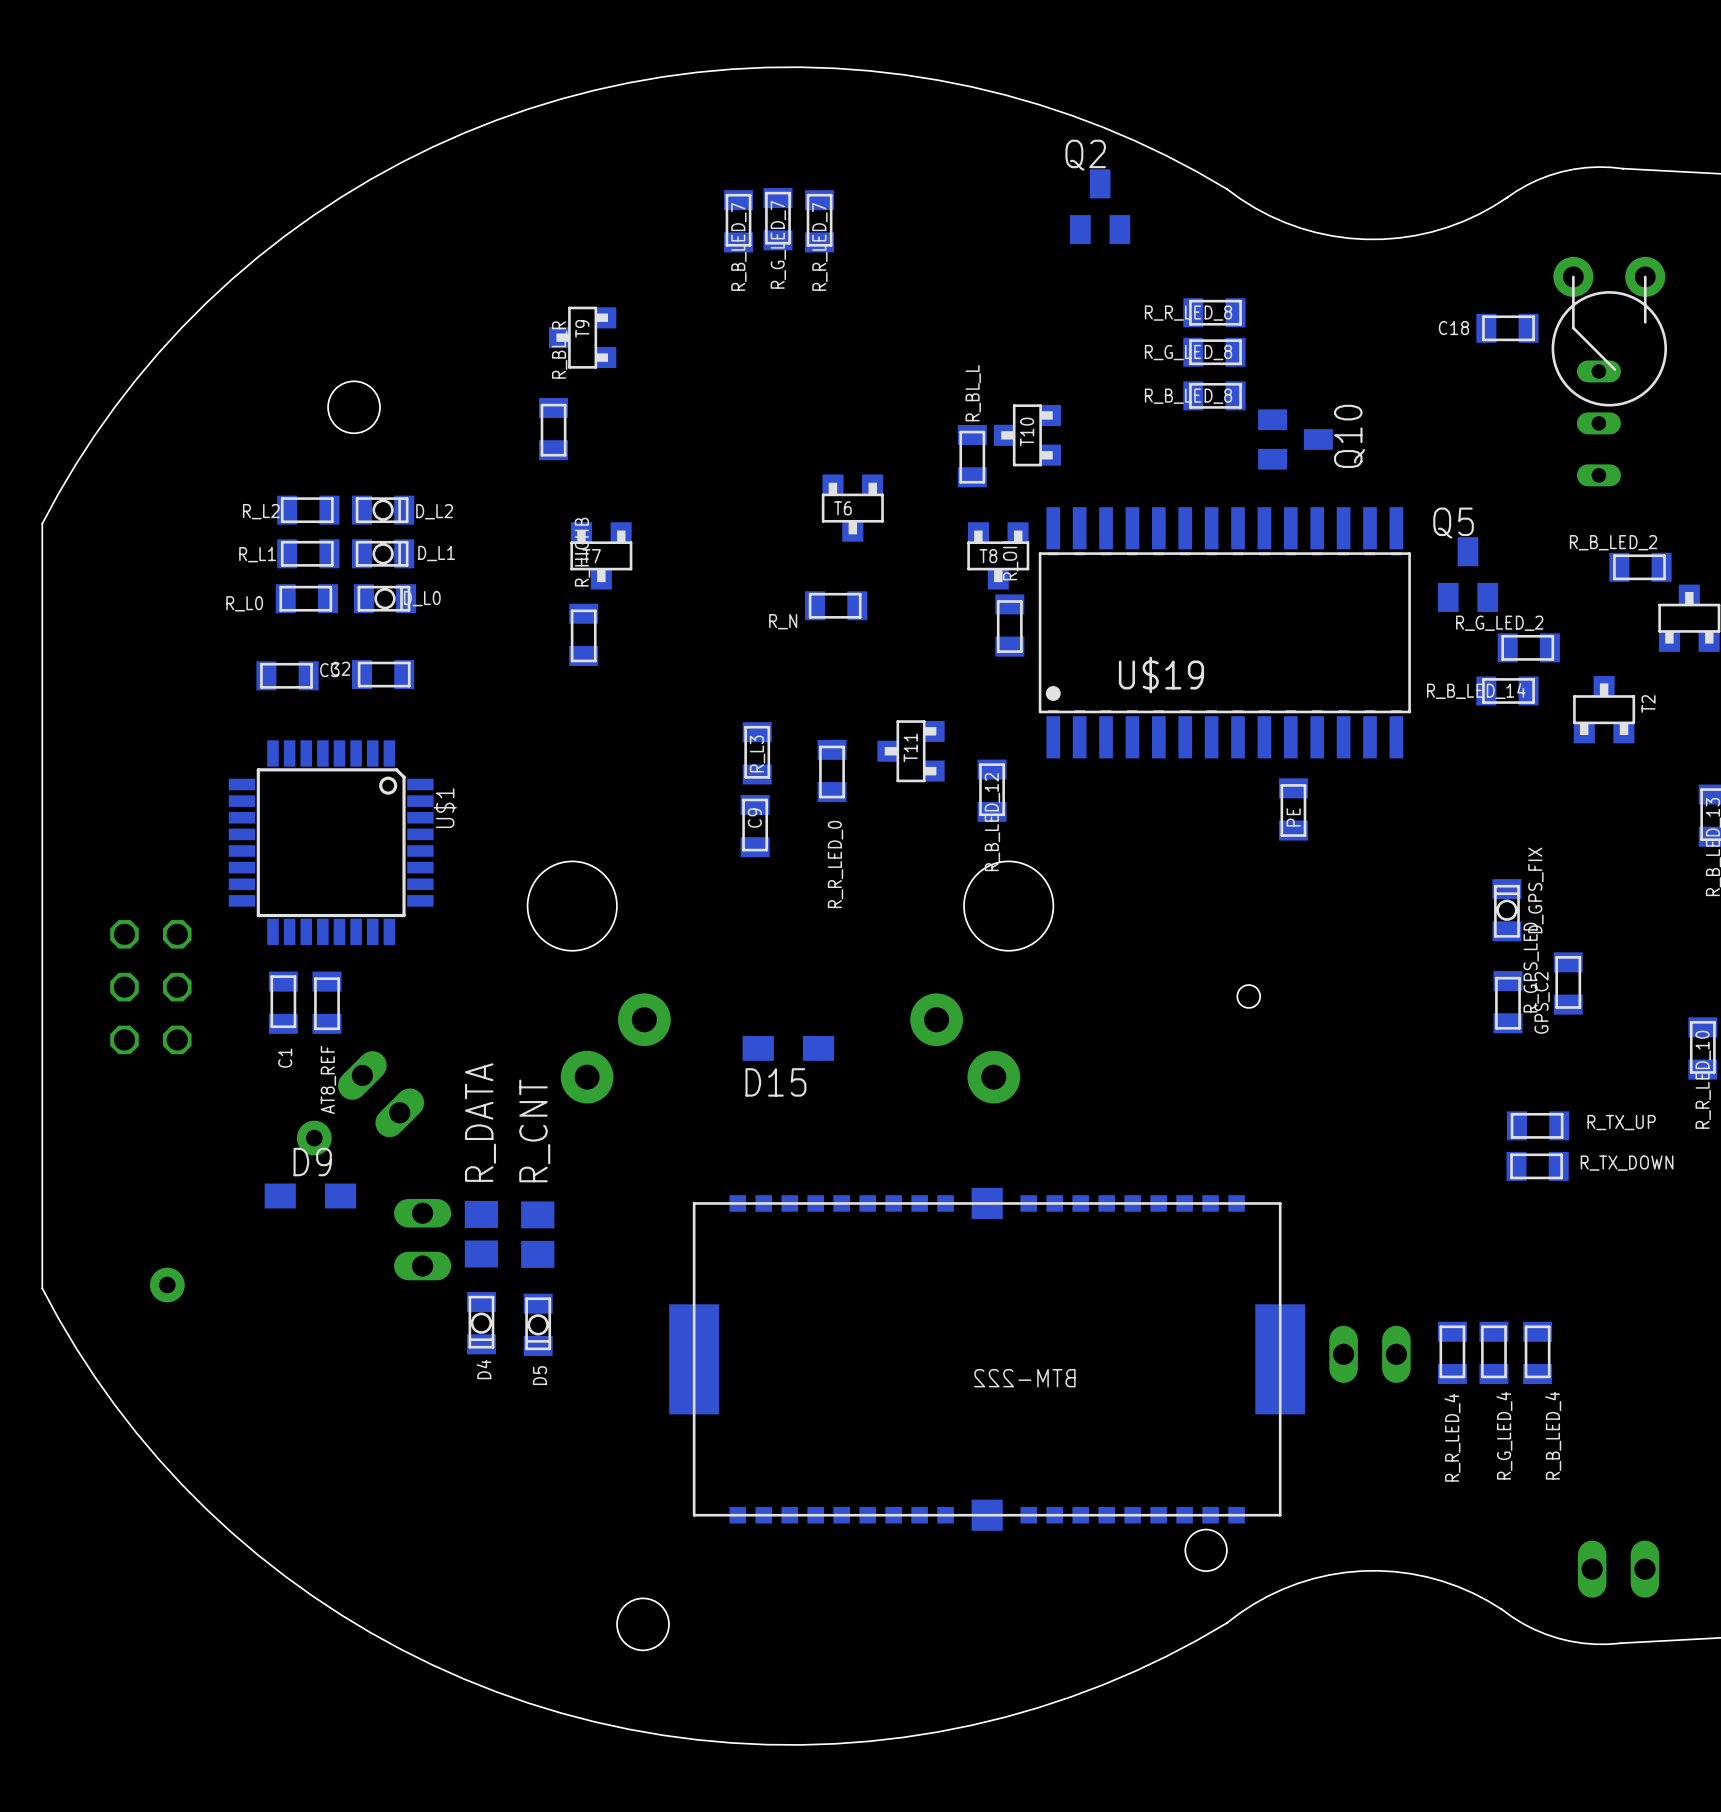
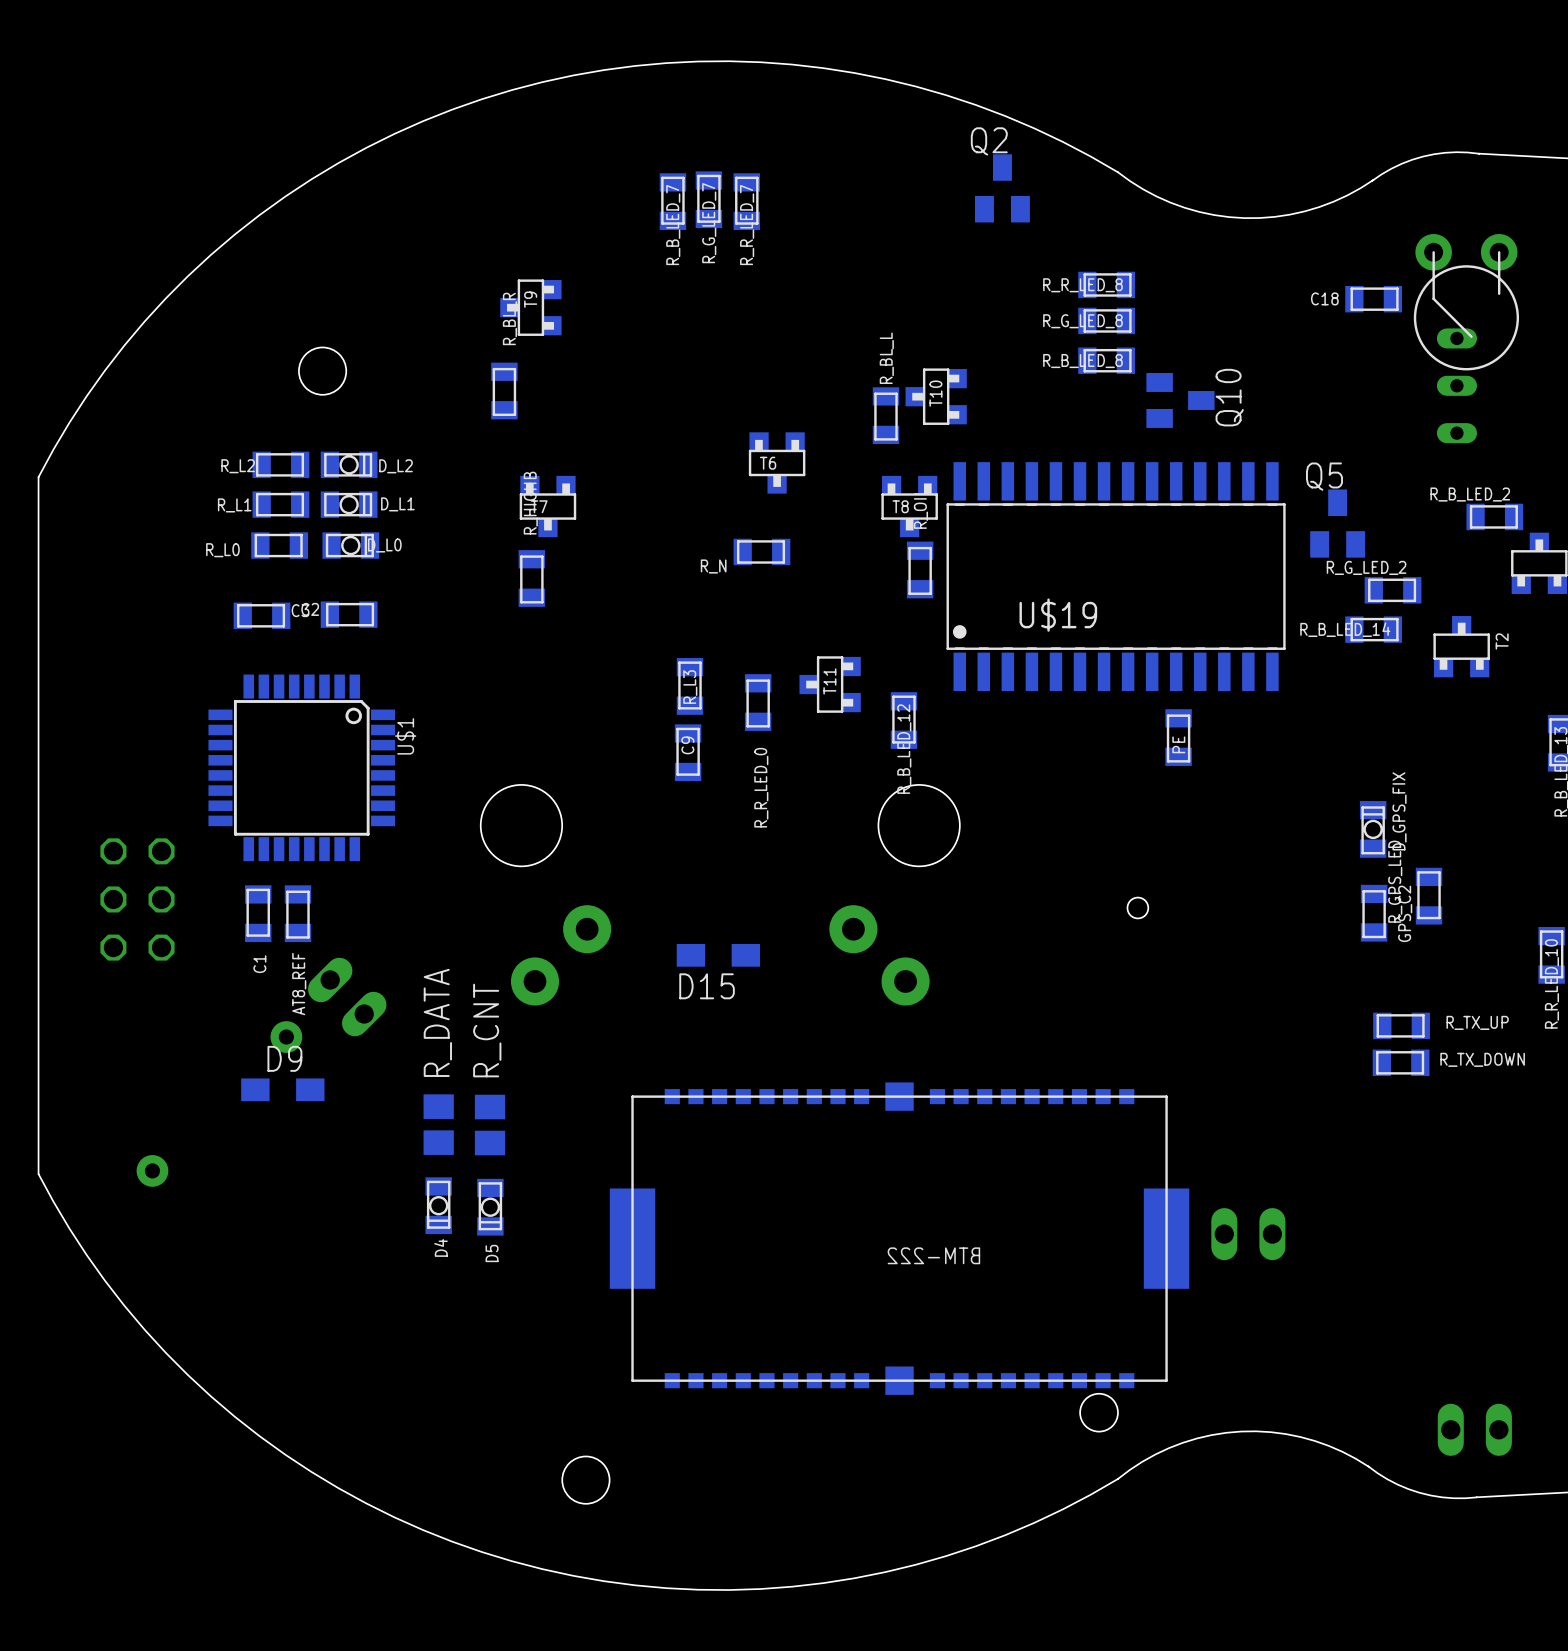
part: (422, 1239) -> none
R_R_LED_4: (1452, 1352) -> none
R_G_LED_4: (1493, 1352) -> none
R_B_LED_4: (1537, 1352) -> none

